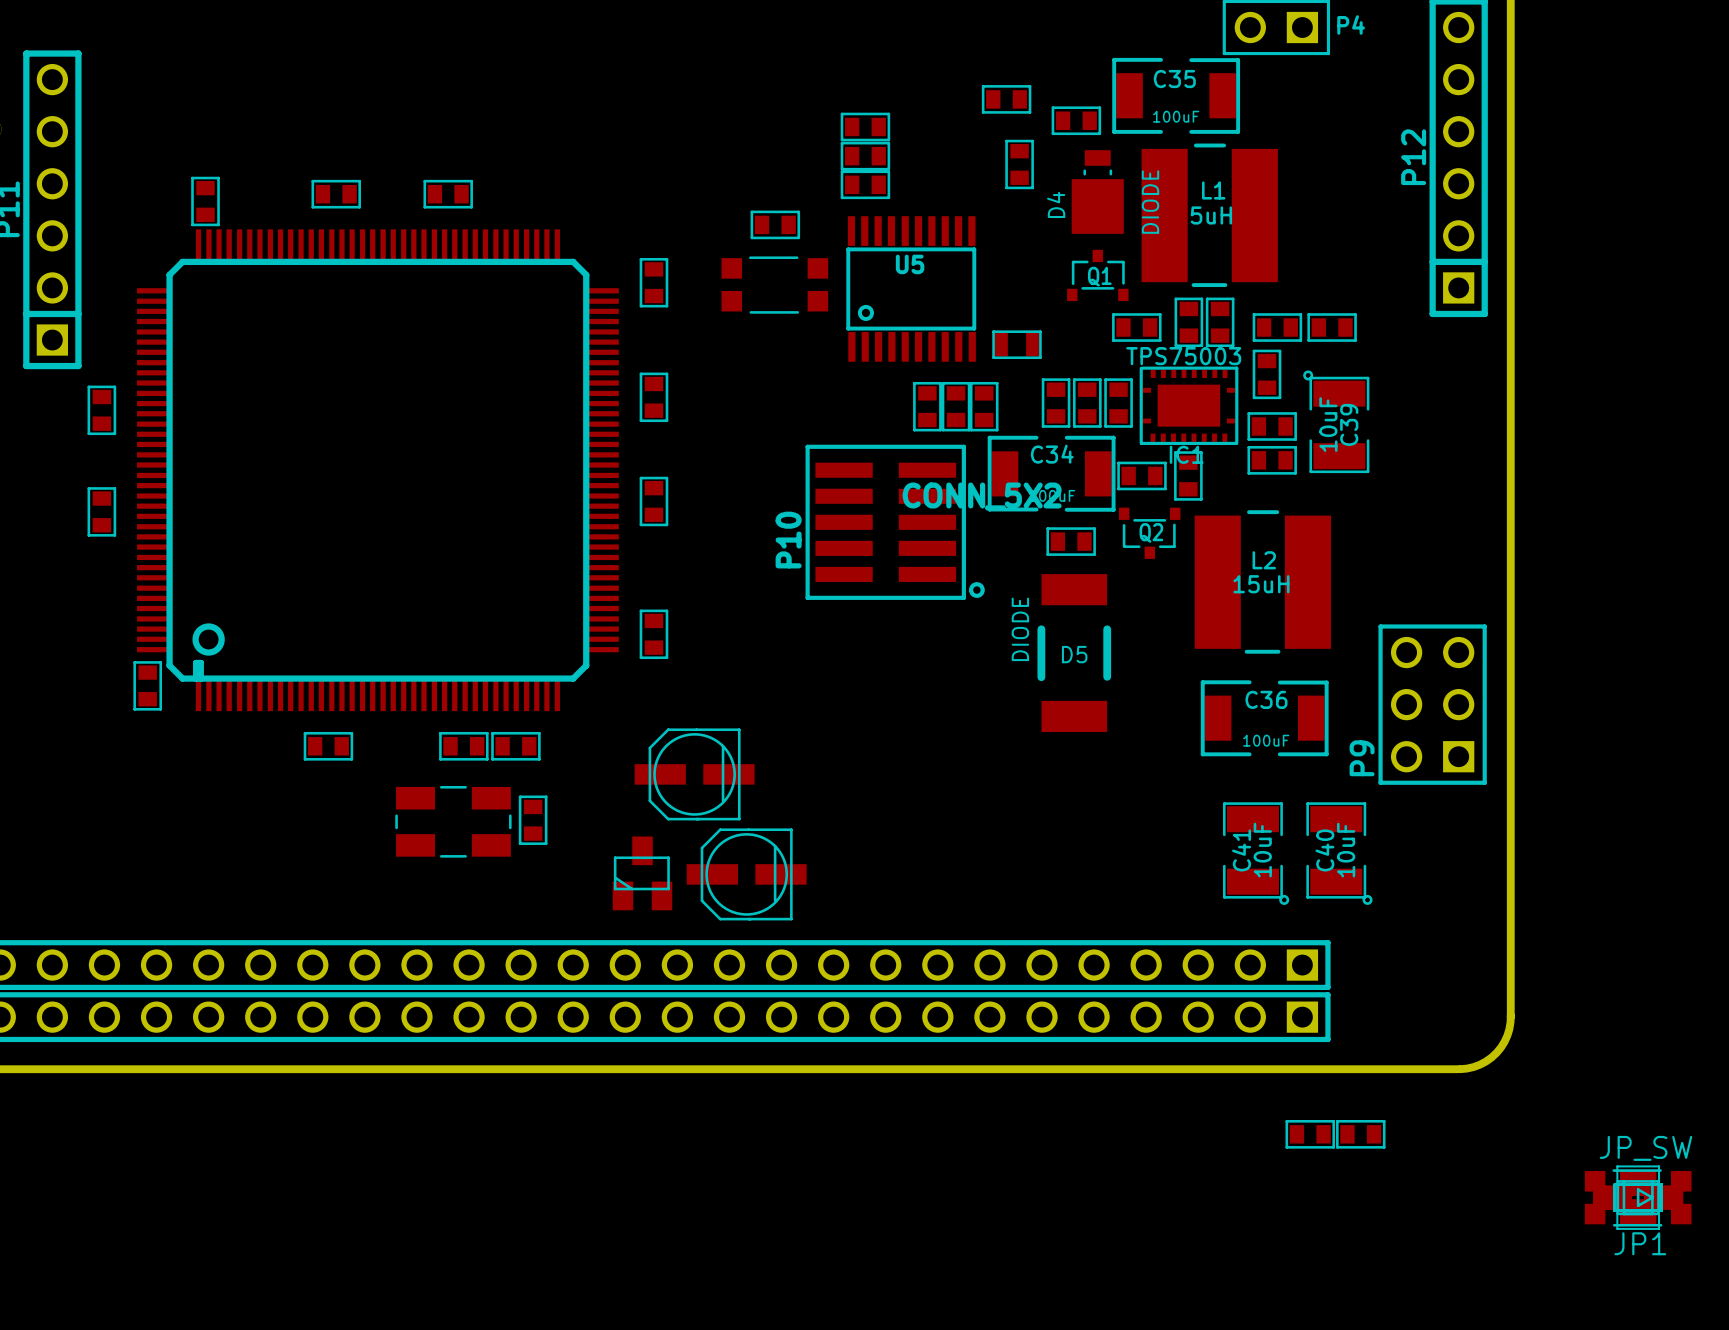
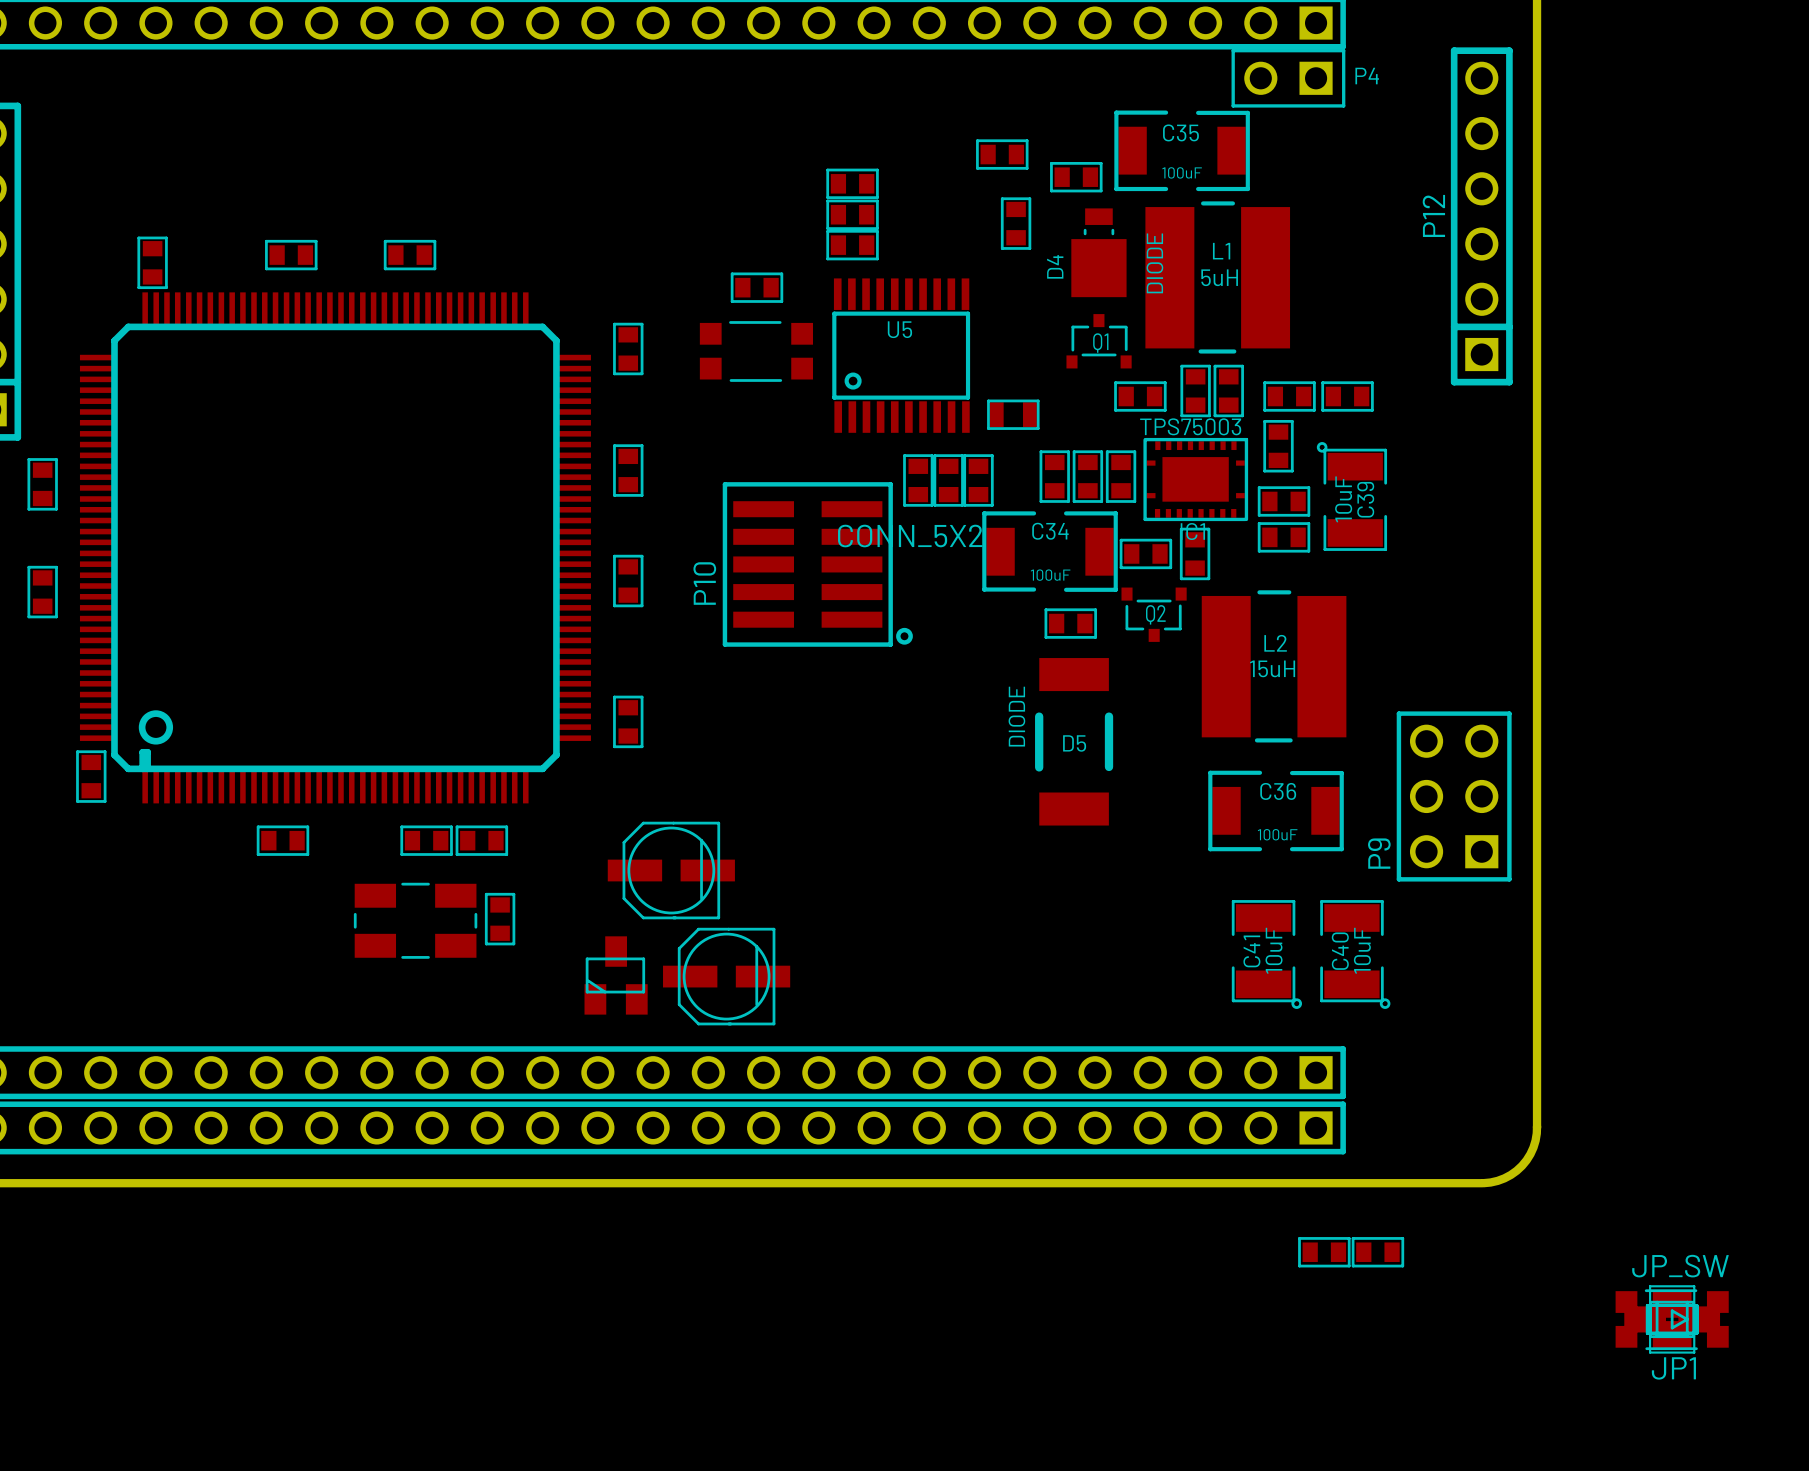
P10 position: (895, 522) -> (817, 564)

